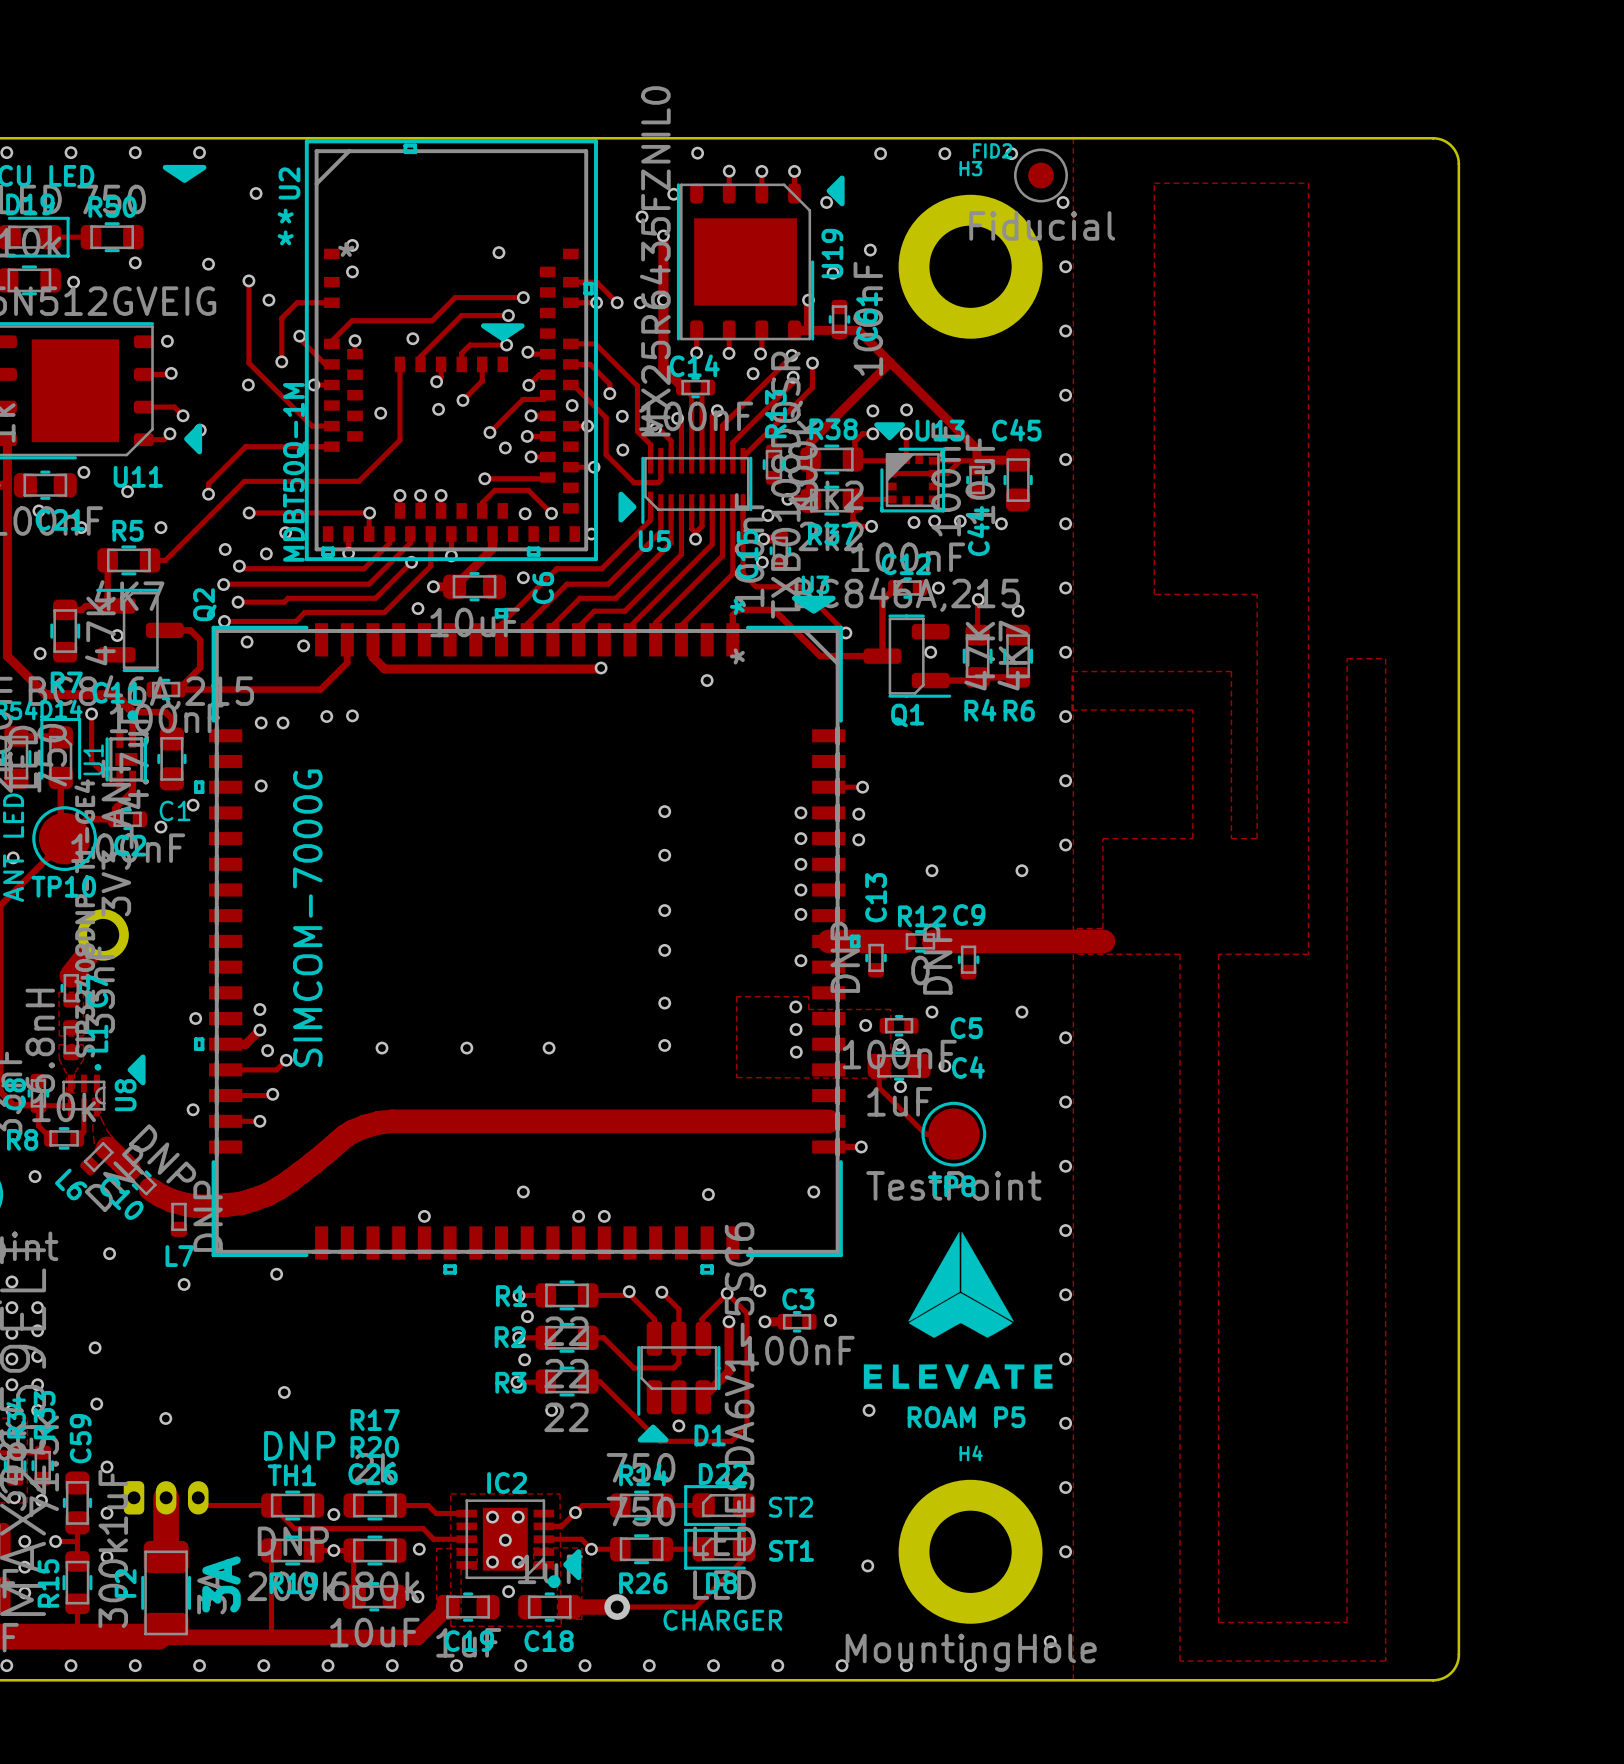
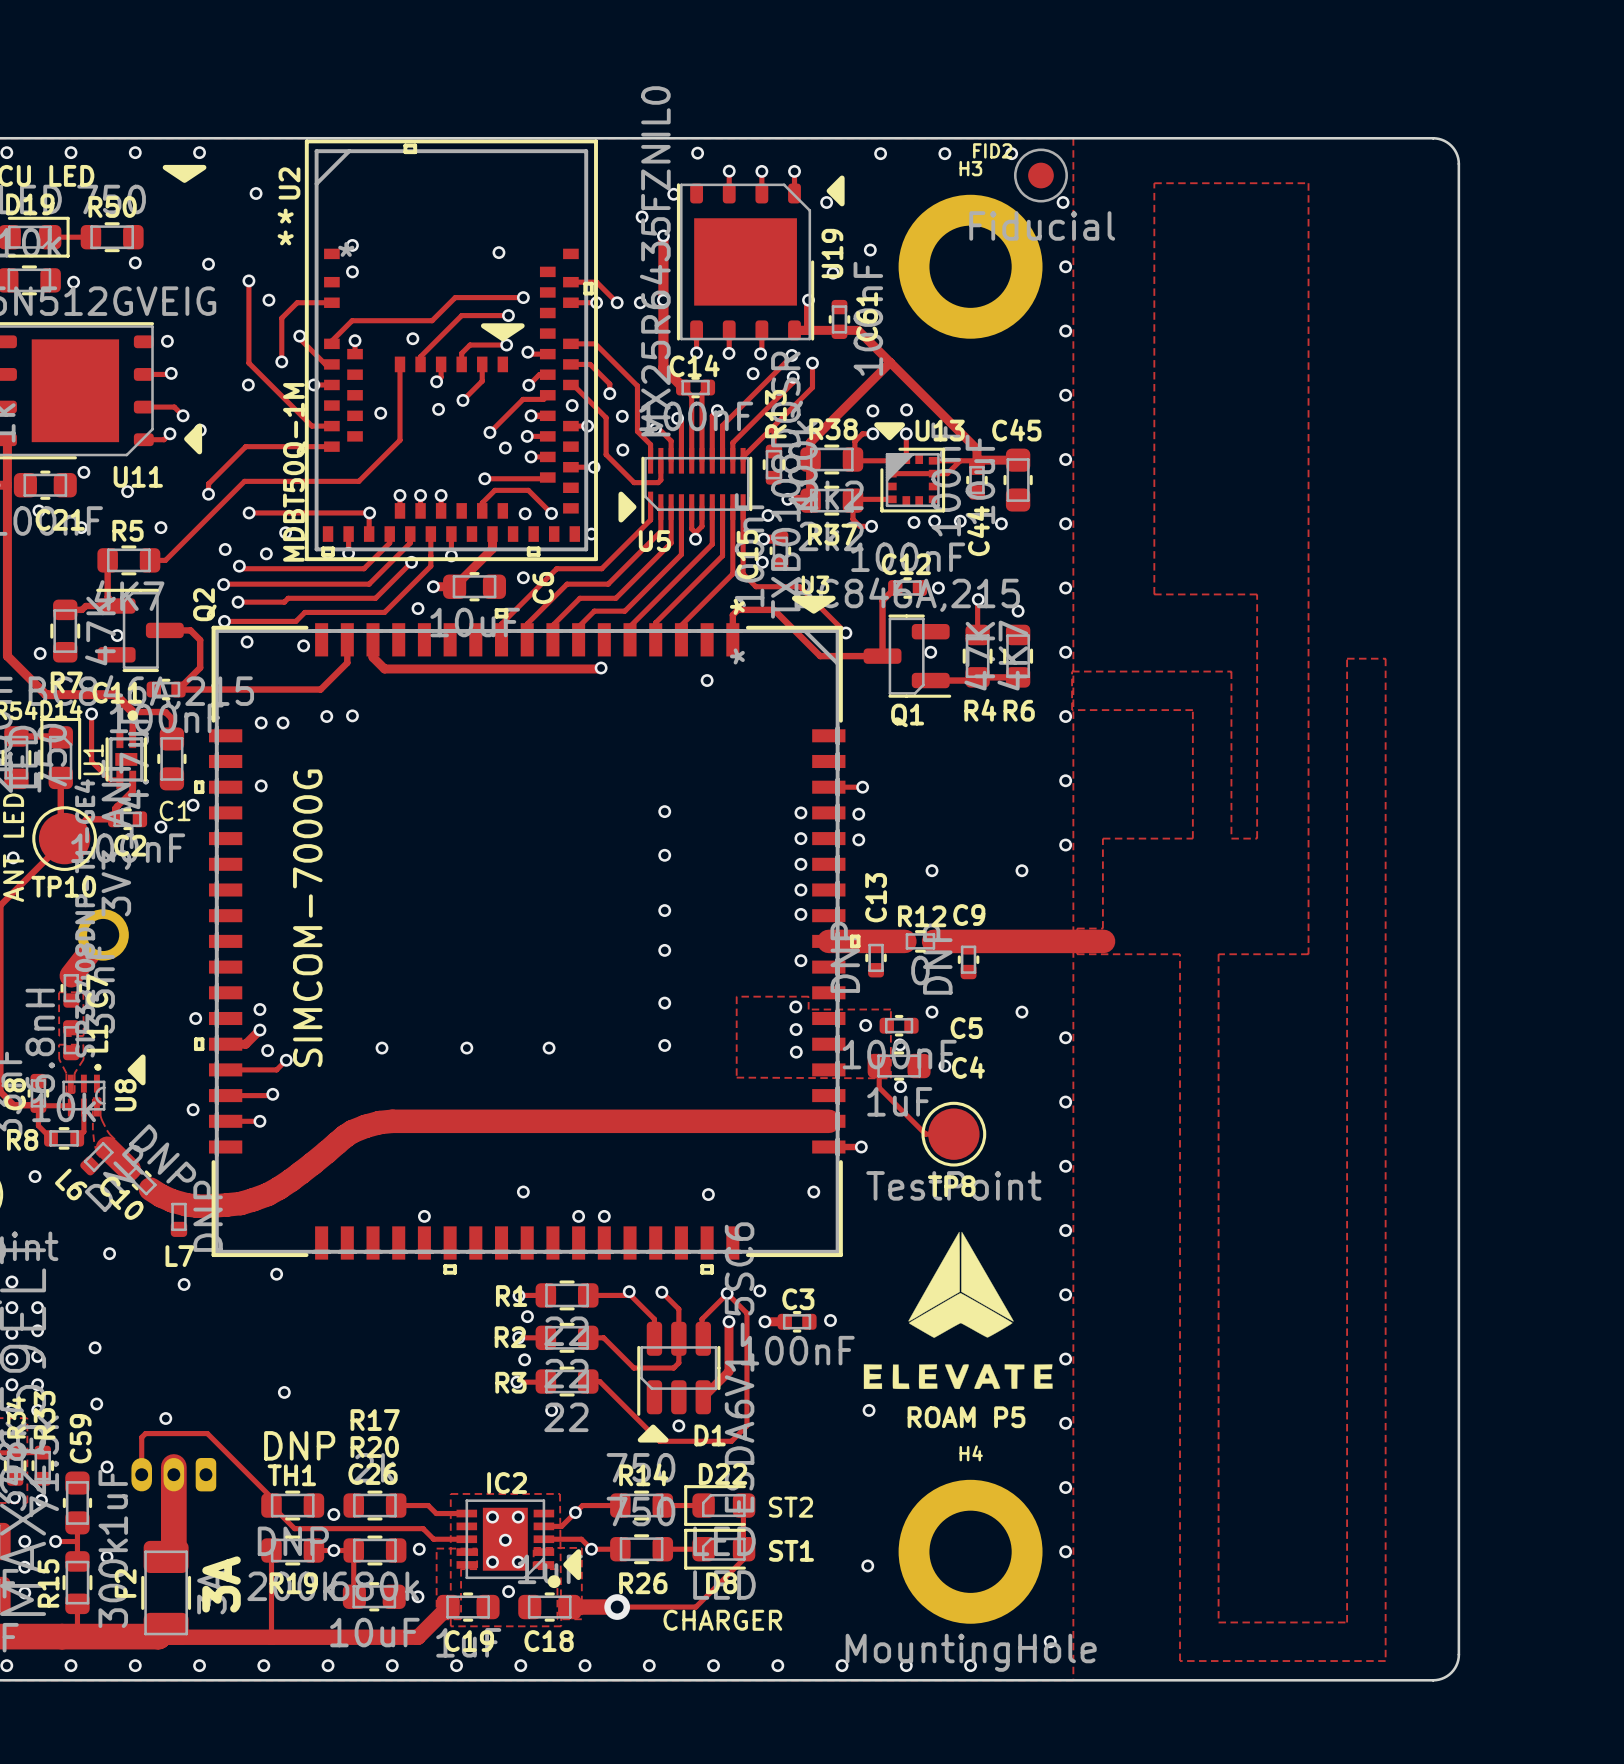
track: (166, 1497) (166, 1556) -> (173, 1466) (173, 1549) (166, 1556)
part rotation: 0° (166, 1497) -> 180° (173, 1474)
track: (198, 1497) (205, 1505) (271, 1505) -> (141, 1466) (141, 1437) (145, 1433) (207, 1433) (271, 1497) (271, 1505)
via: (107, 1513) -> none

